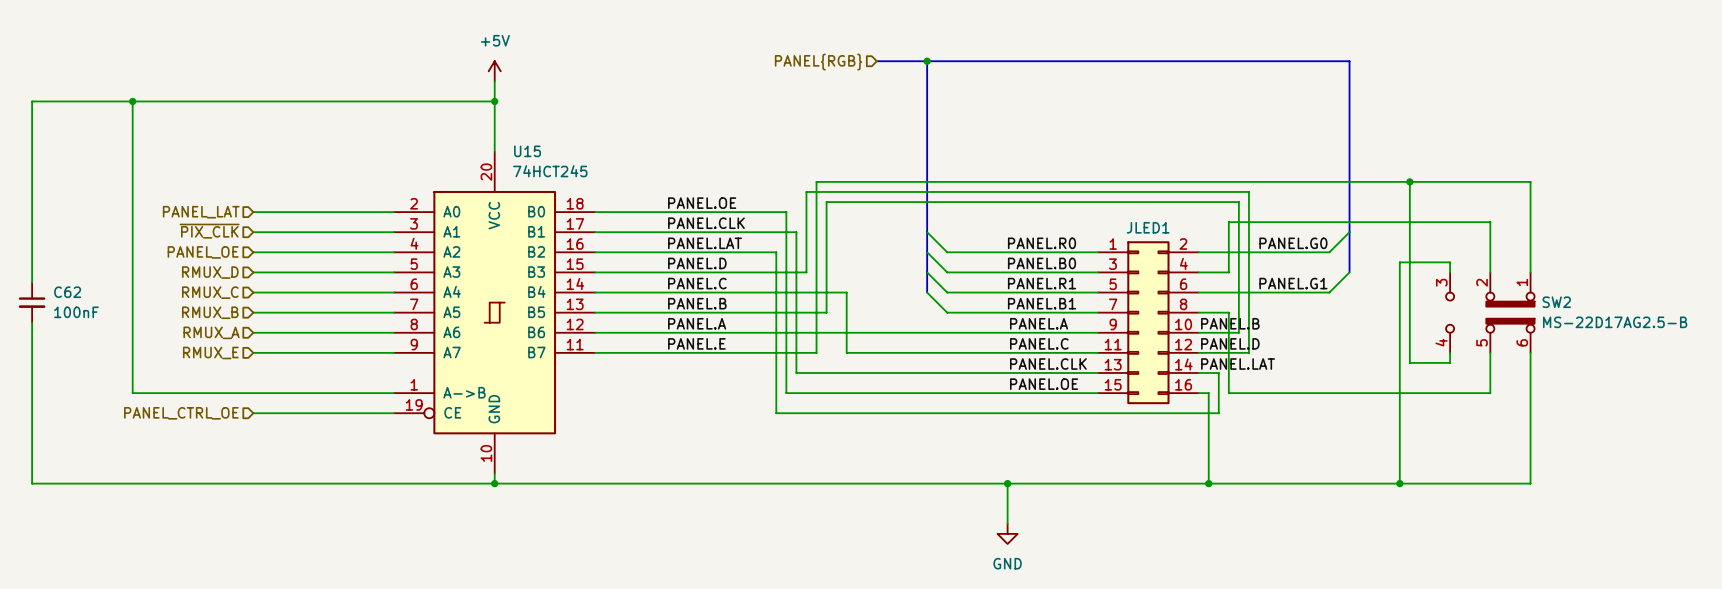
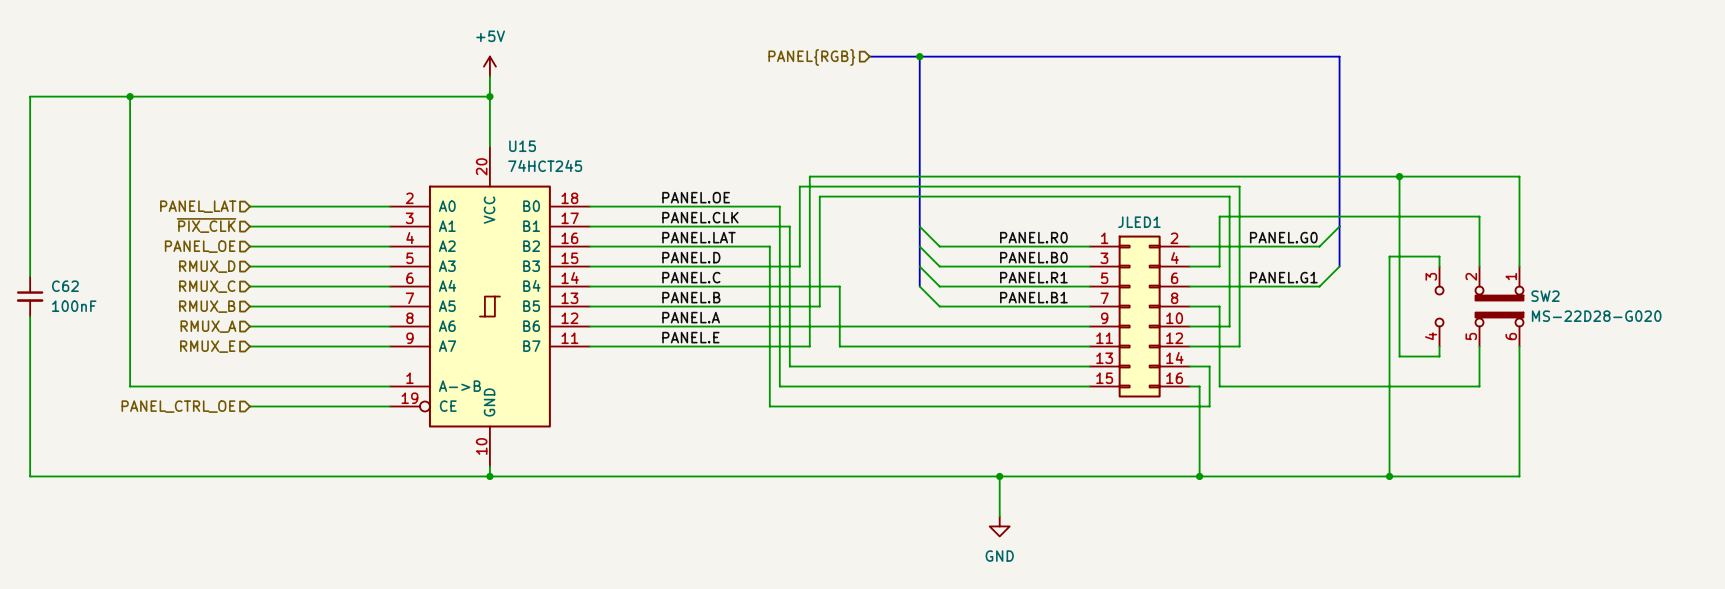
SW2 value: MS-22D17AG2.5-B (1615, 322) -> MS-22D28-G020 (1596, 316)
label: PANEL.A (1039, 323) -> none
label: PANEL.B (1230, 323) -> none
label: PANEL.C (1039, 343) -> none
label: PANEL.D (1230, 343) -> none
label: PANEL.CLK (1048, 364) -> none
label: PANEL.LAT (1238, 364) -> none
label: PANEL.OE (1044, 384) -> none

